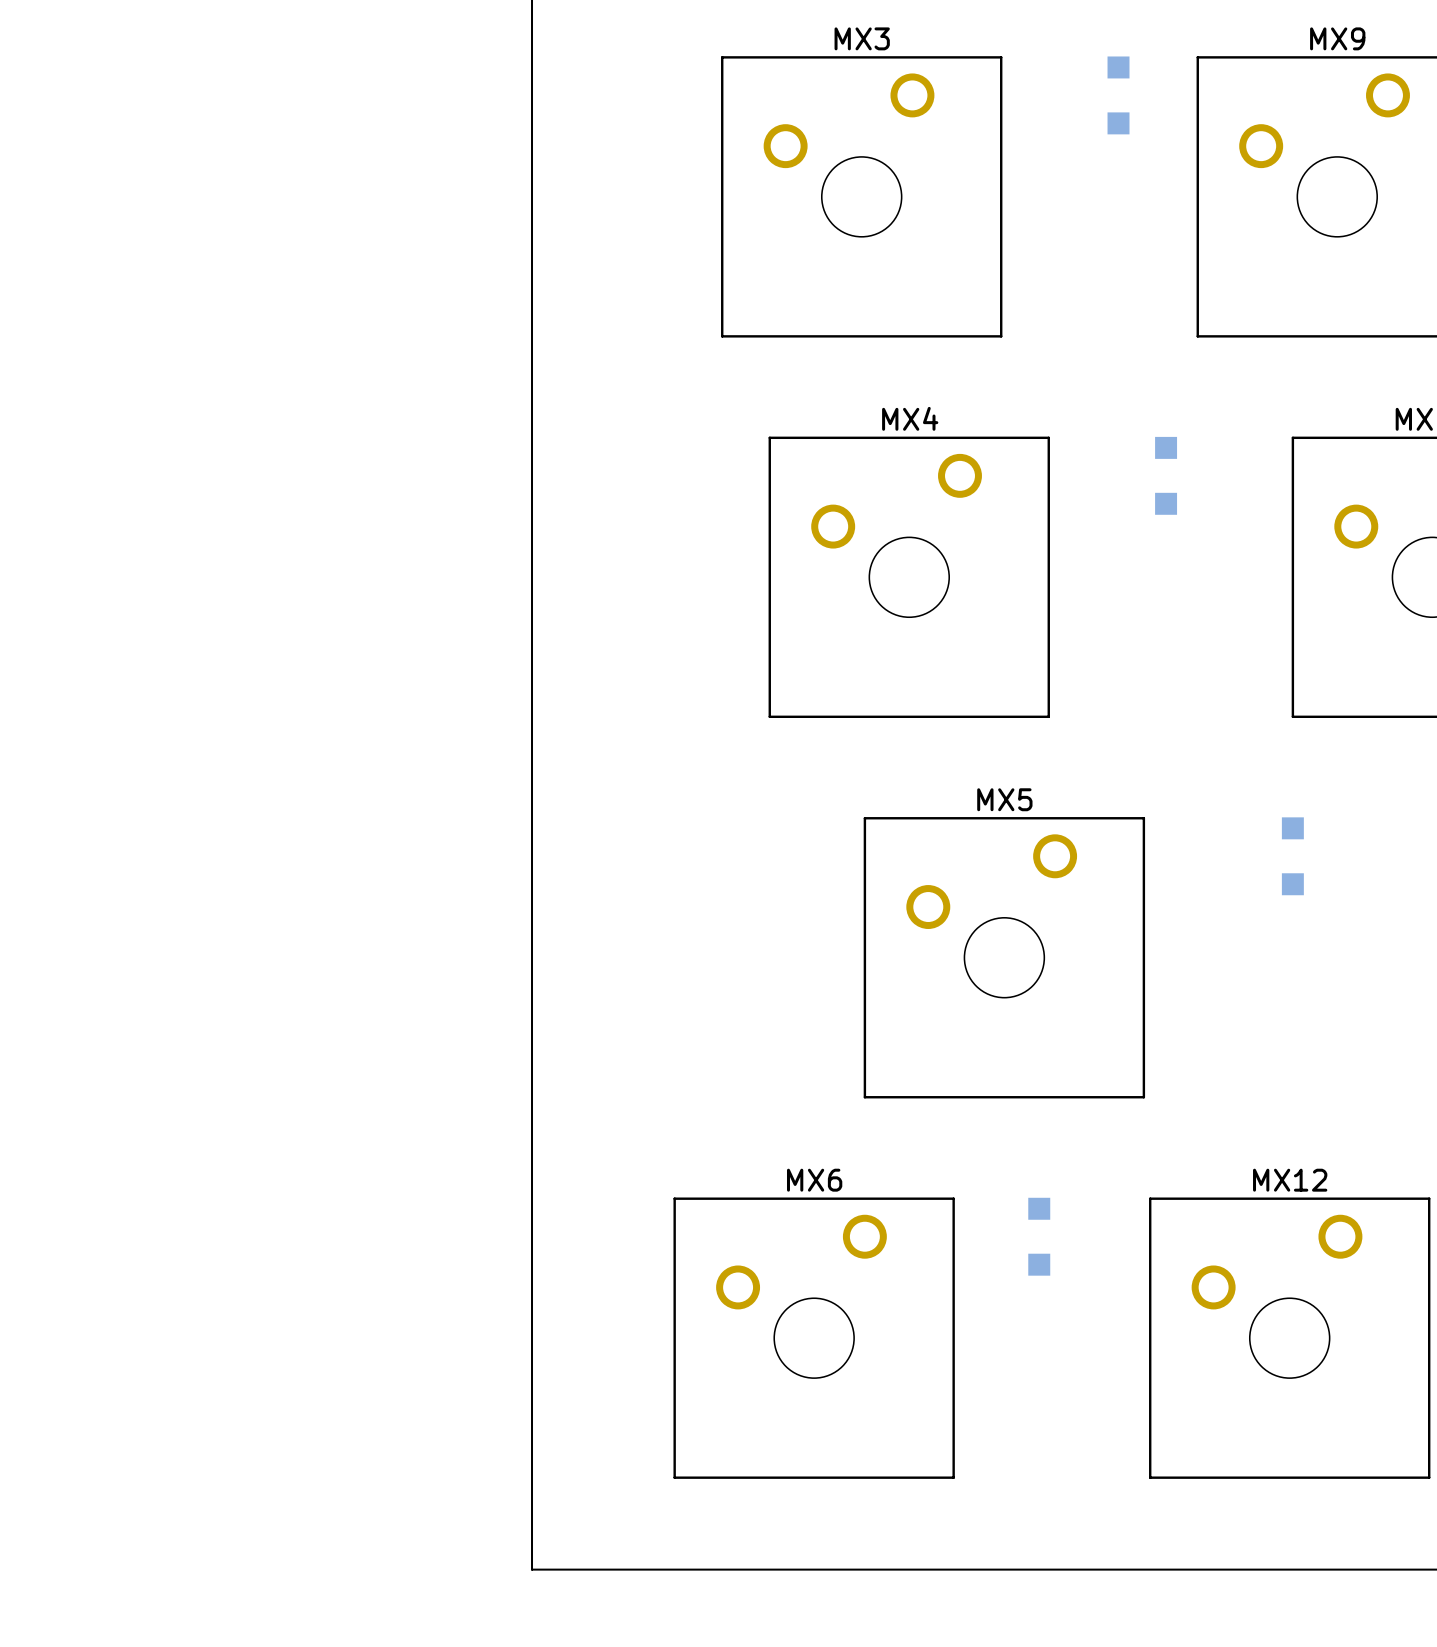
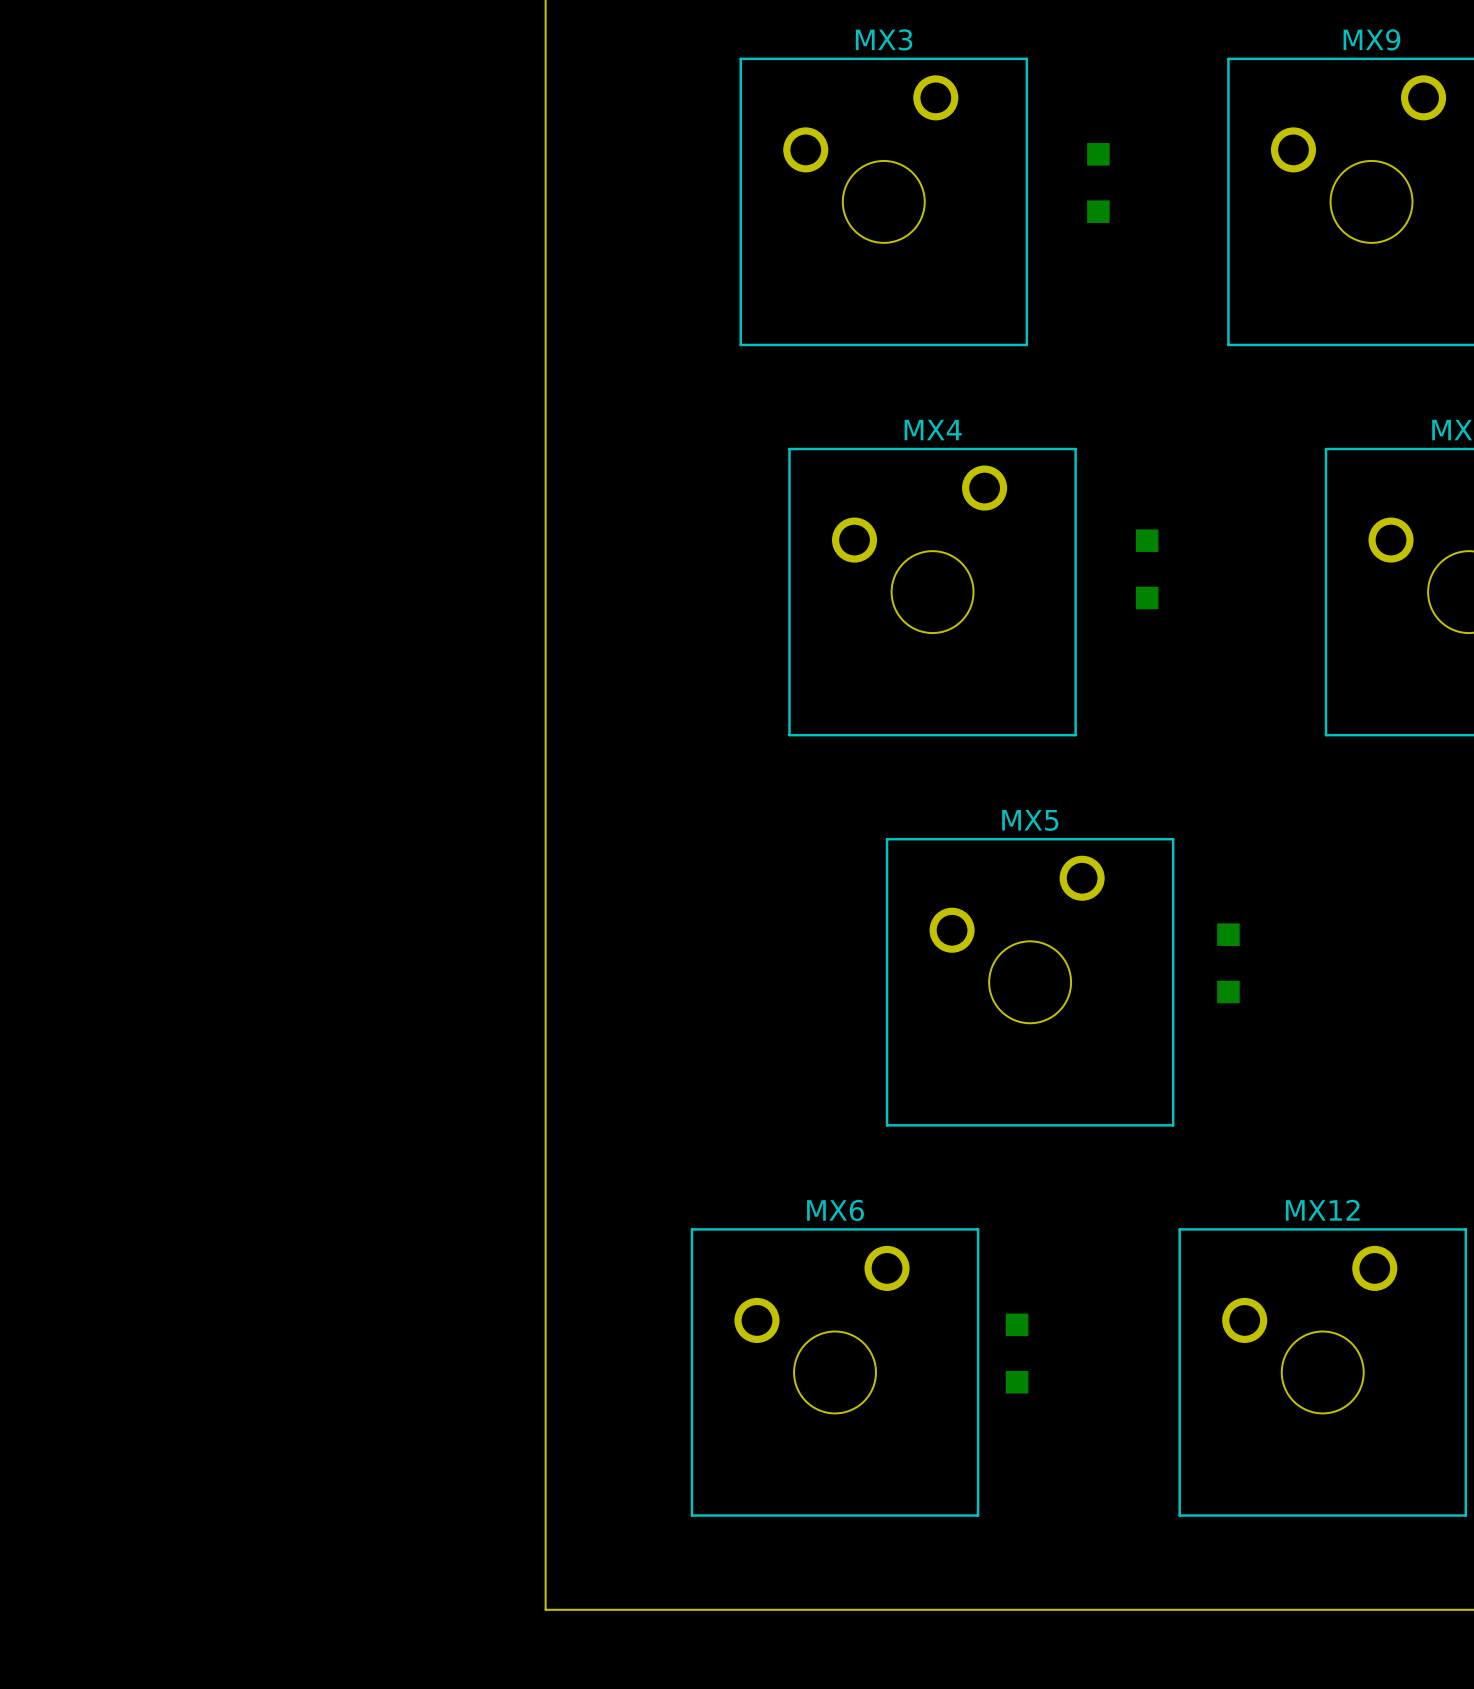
part position: (1118, 95) -> (1098, 182)
part position: (1166, 475) -> (1147, 569)
part position: (1292, 856) -> (1228, 963)
part position: (1039, 1236) -> (1017, 1353)

